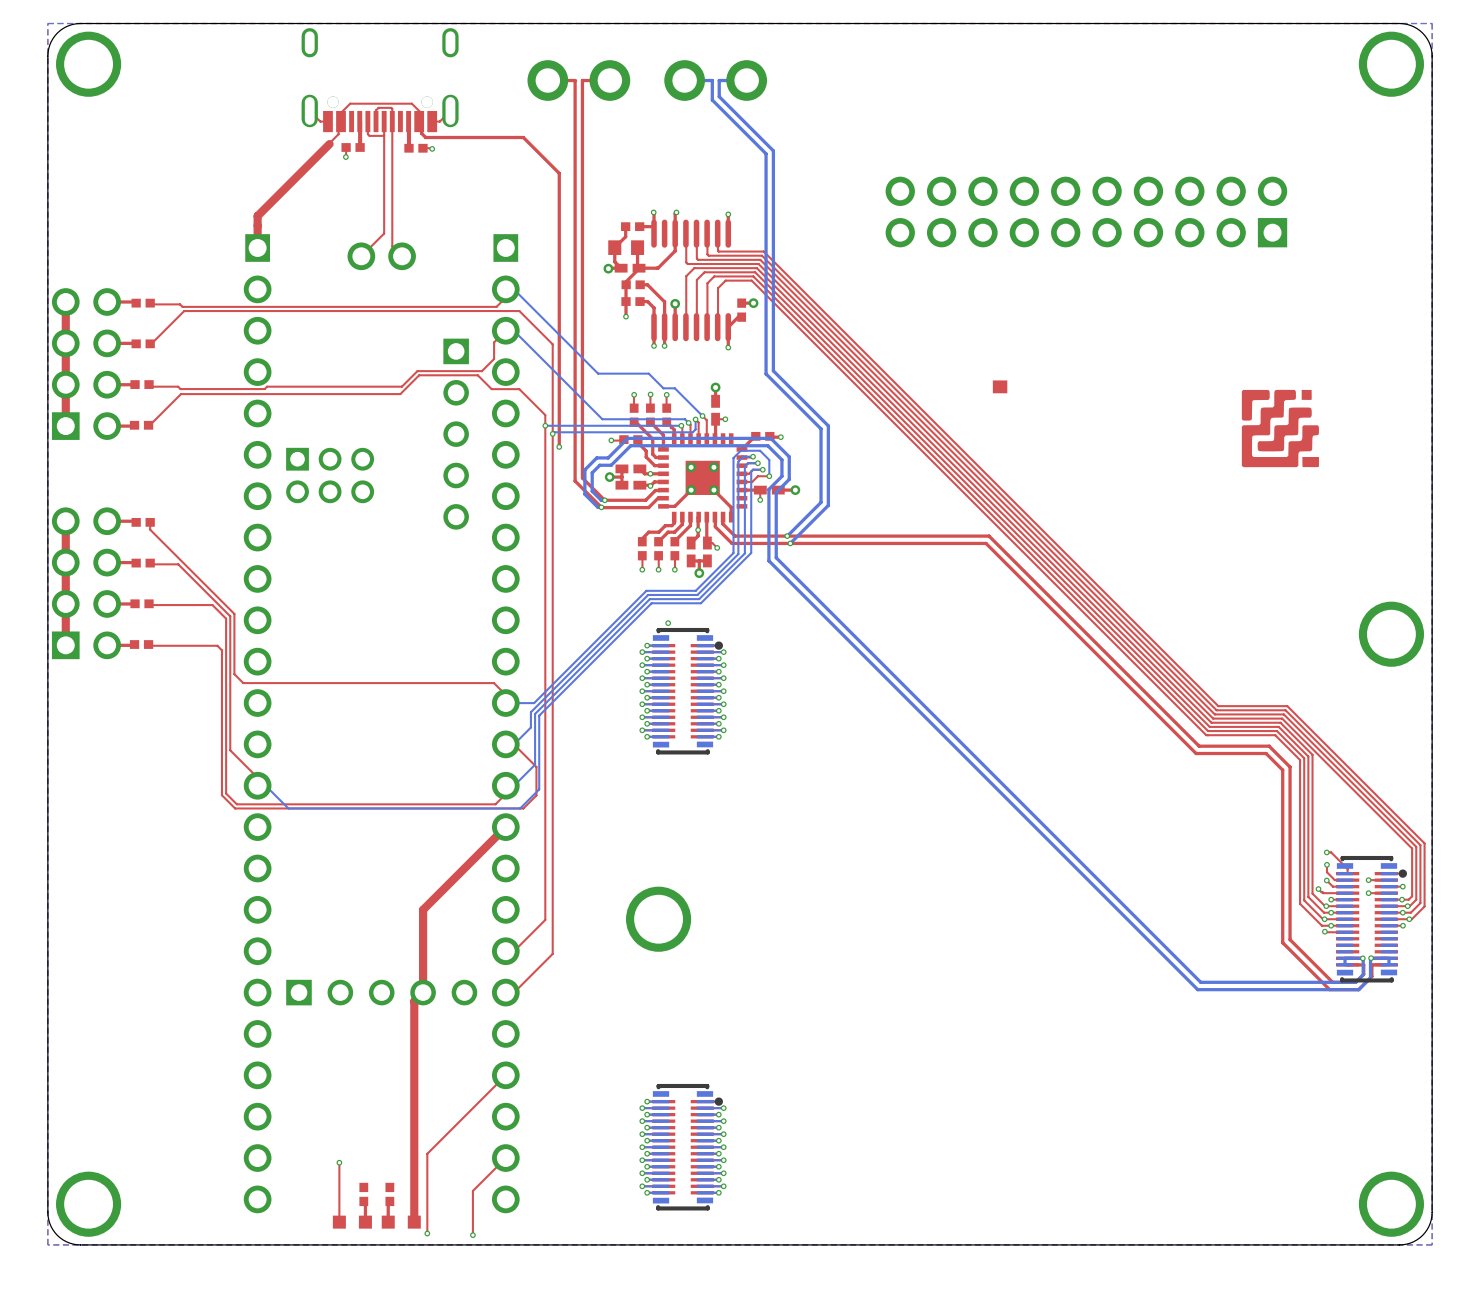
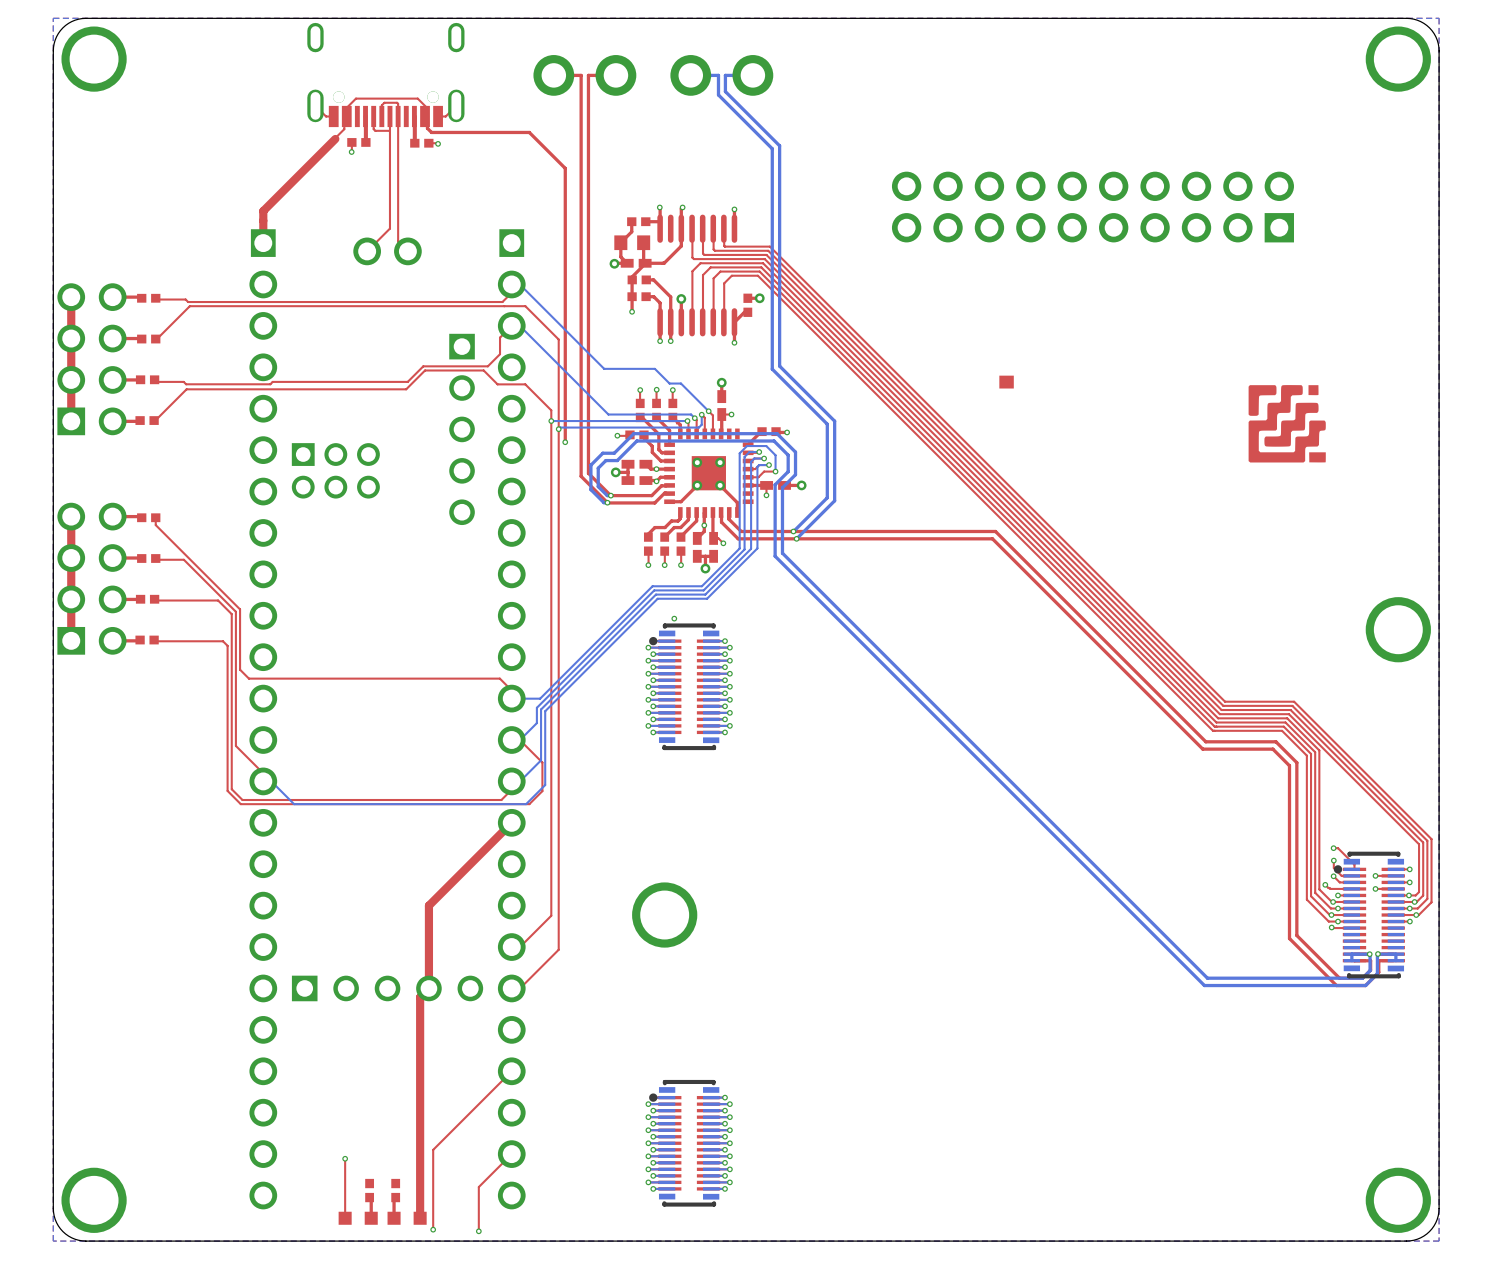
part footprint: [652, 627, 723, 755] -> [649, 623, 720, 751]
part footprint: [1336, 855, 1407, 983] -> [1333, 851, 1405, 979]
part footprint: [652, 1083, 723, 1211] -> [649, 1079, 720, 1207]

